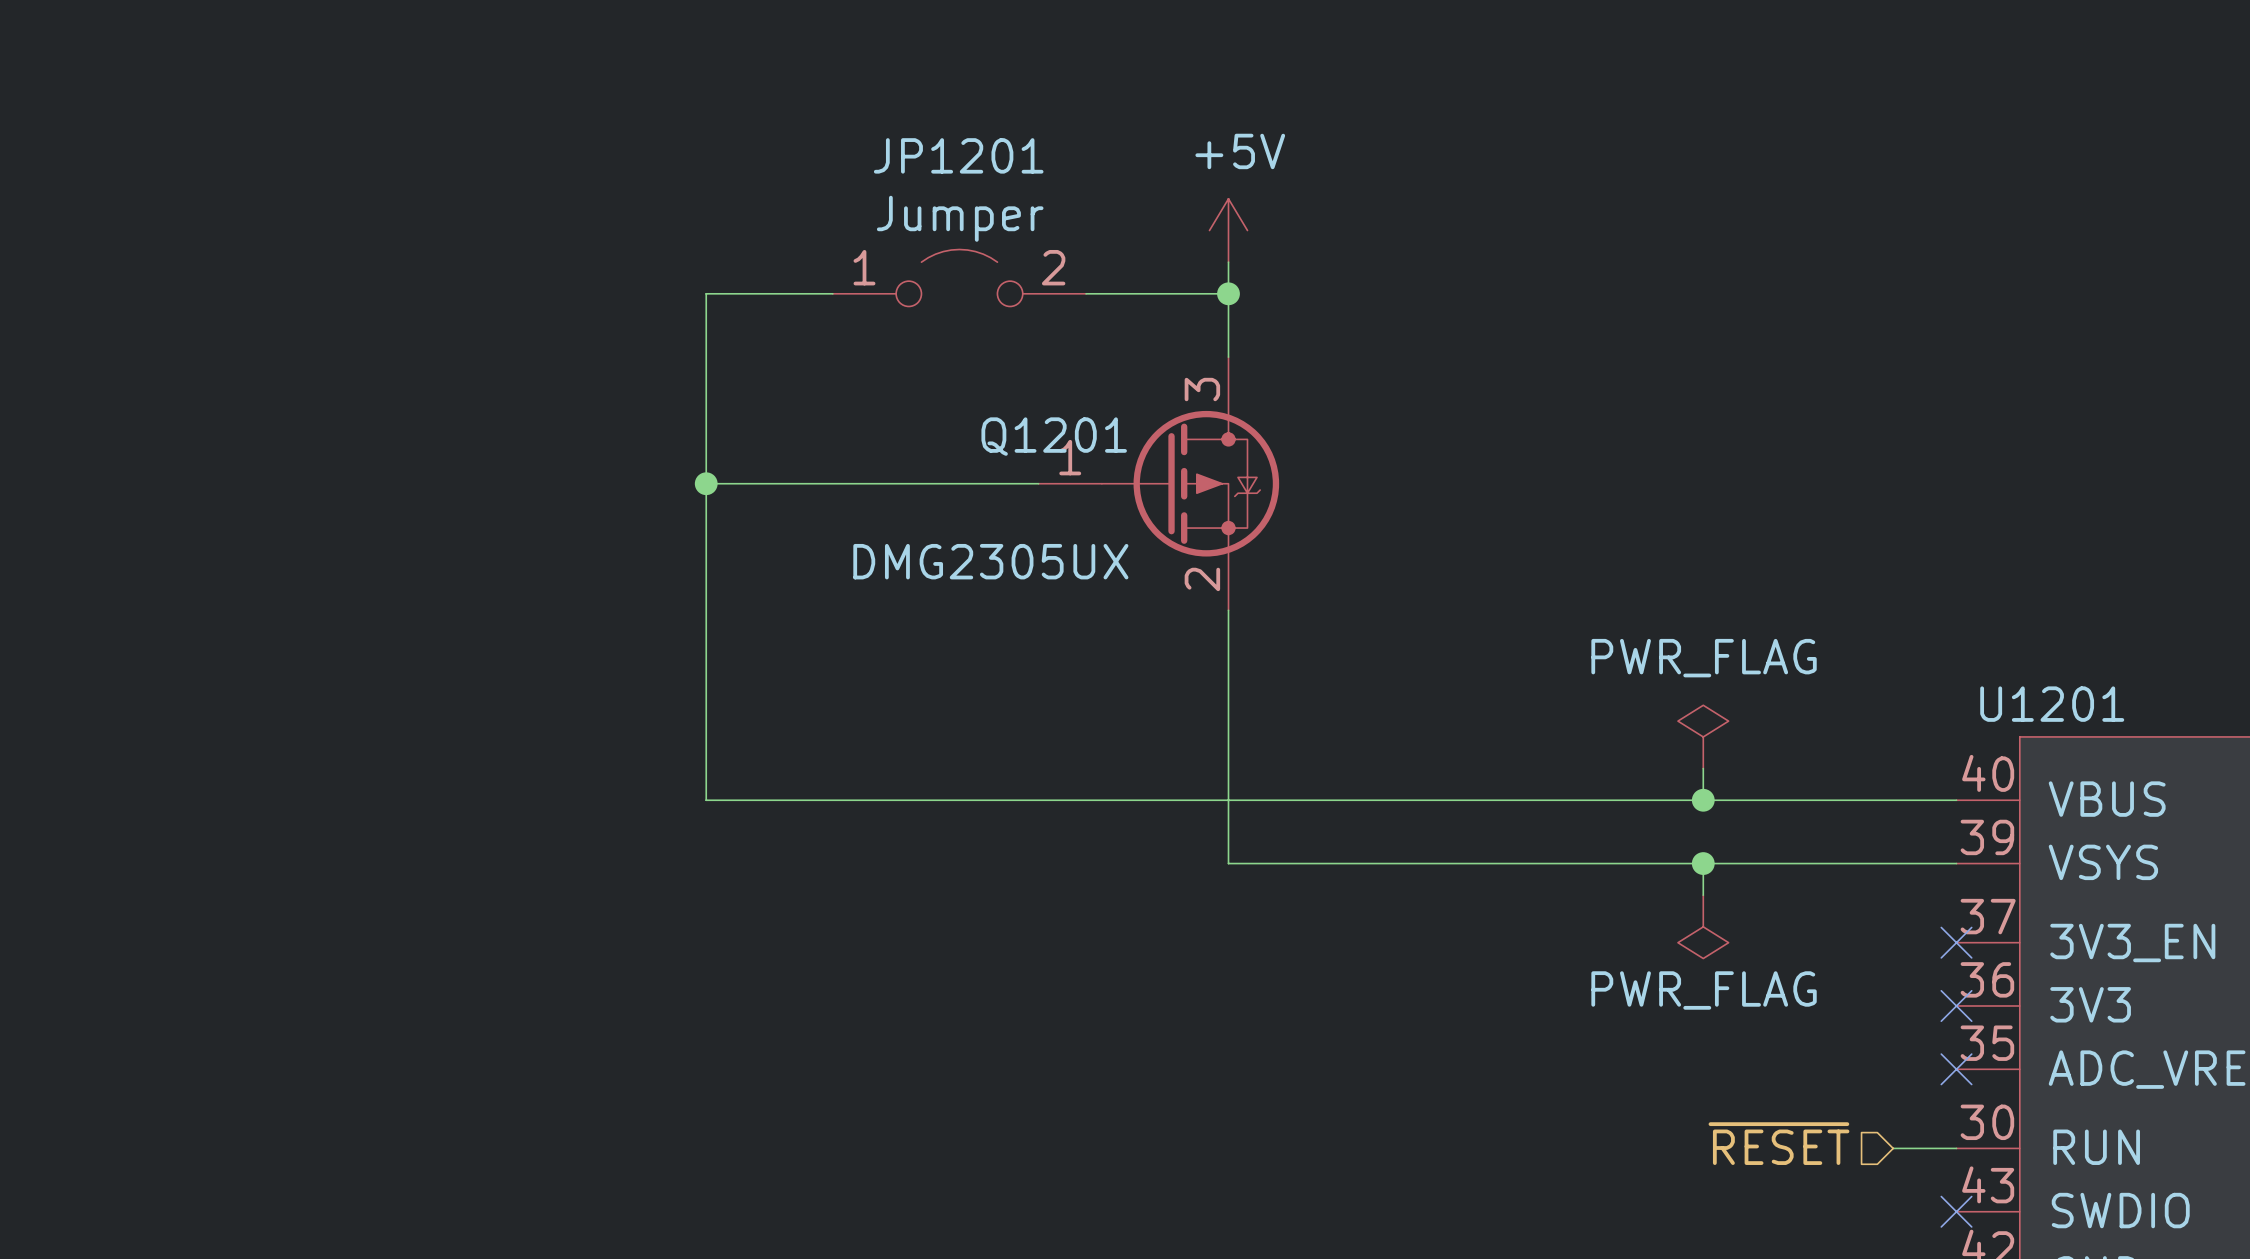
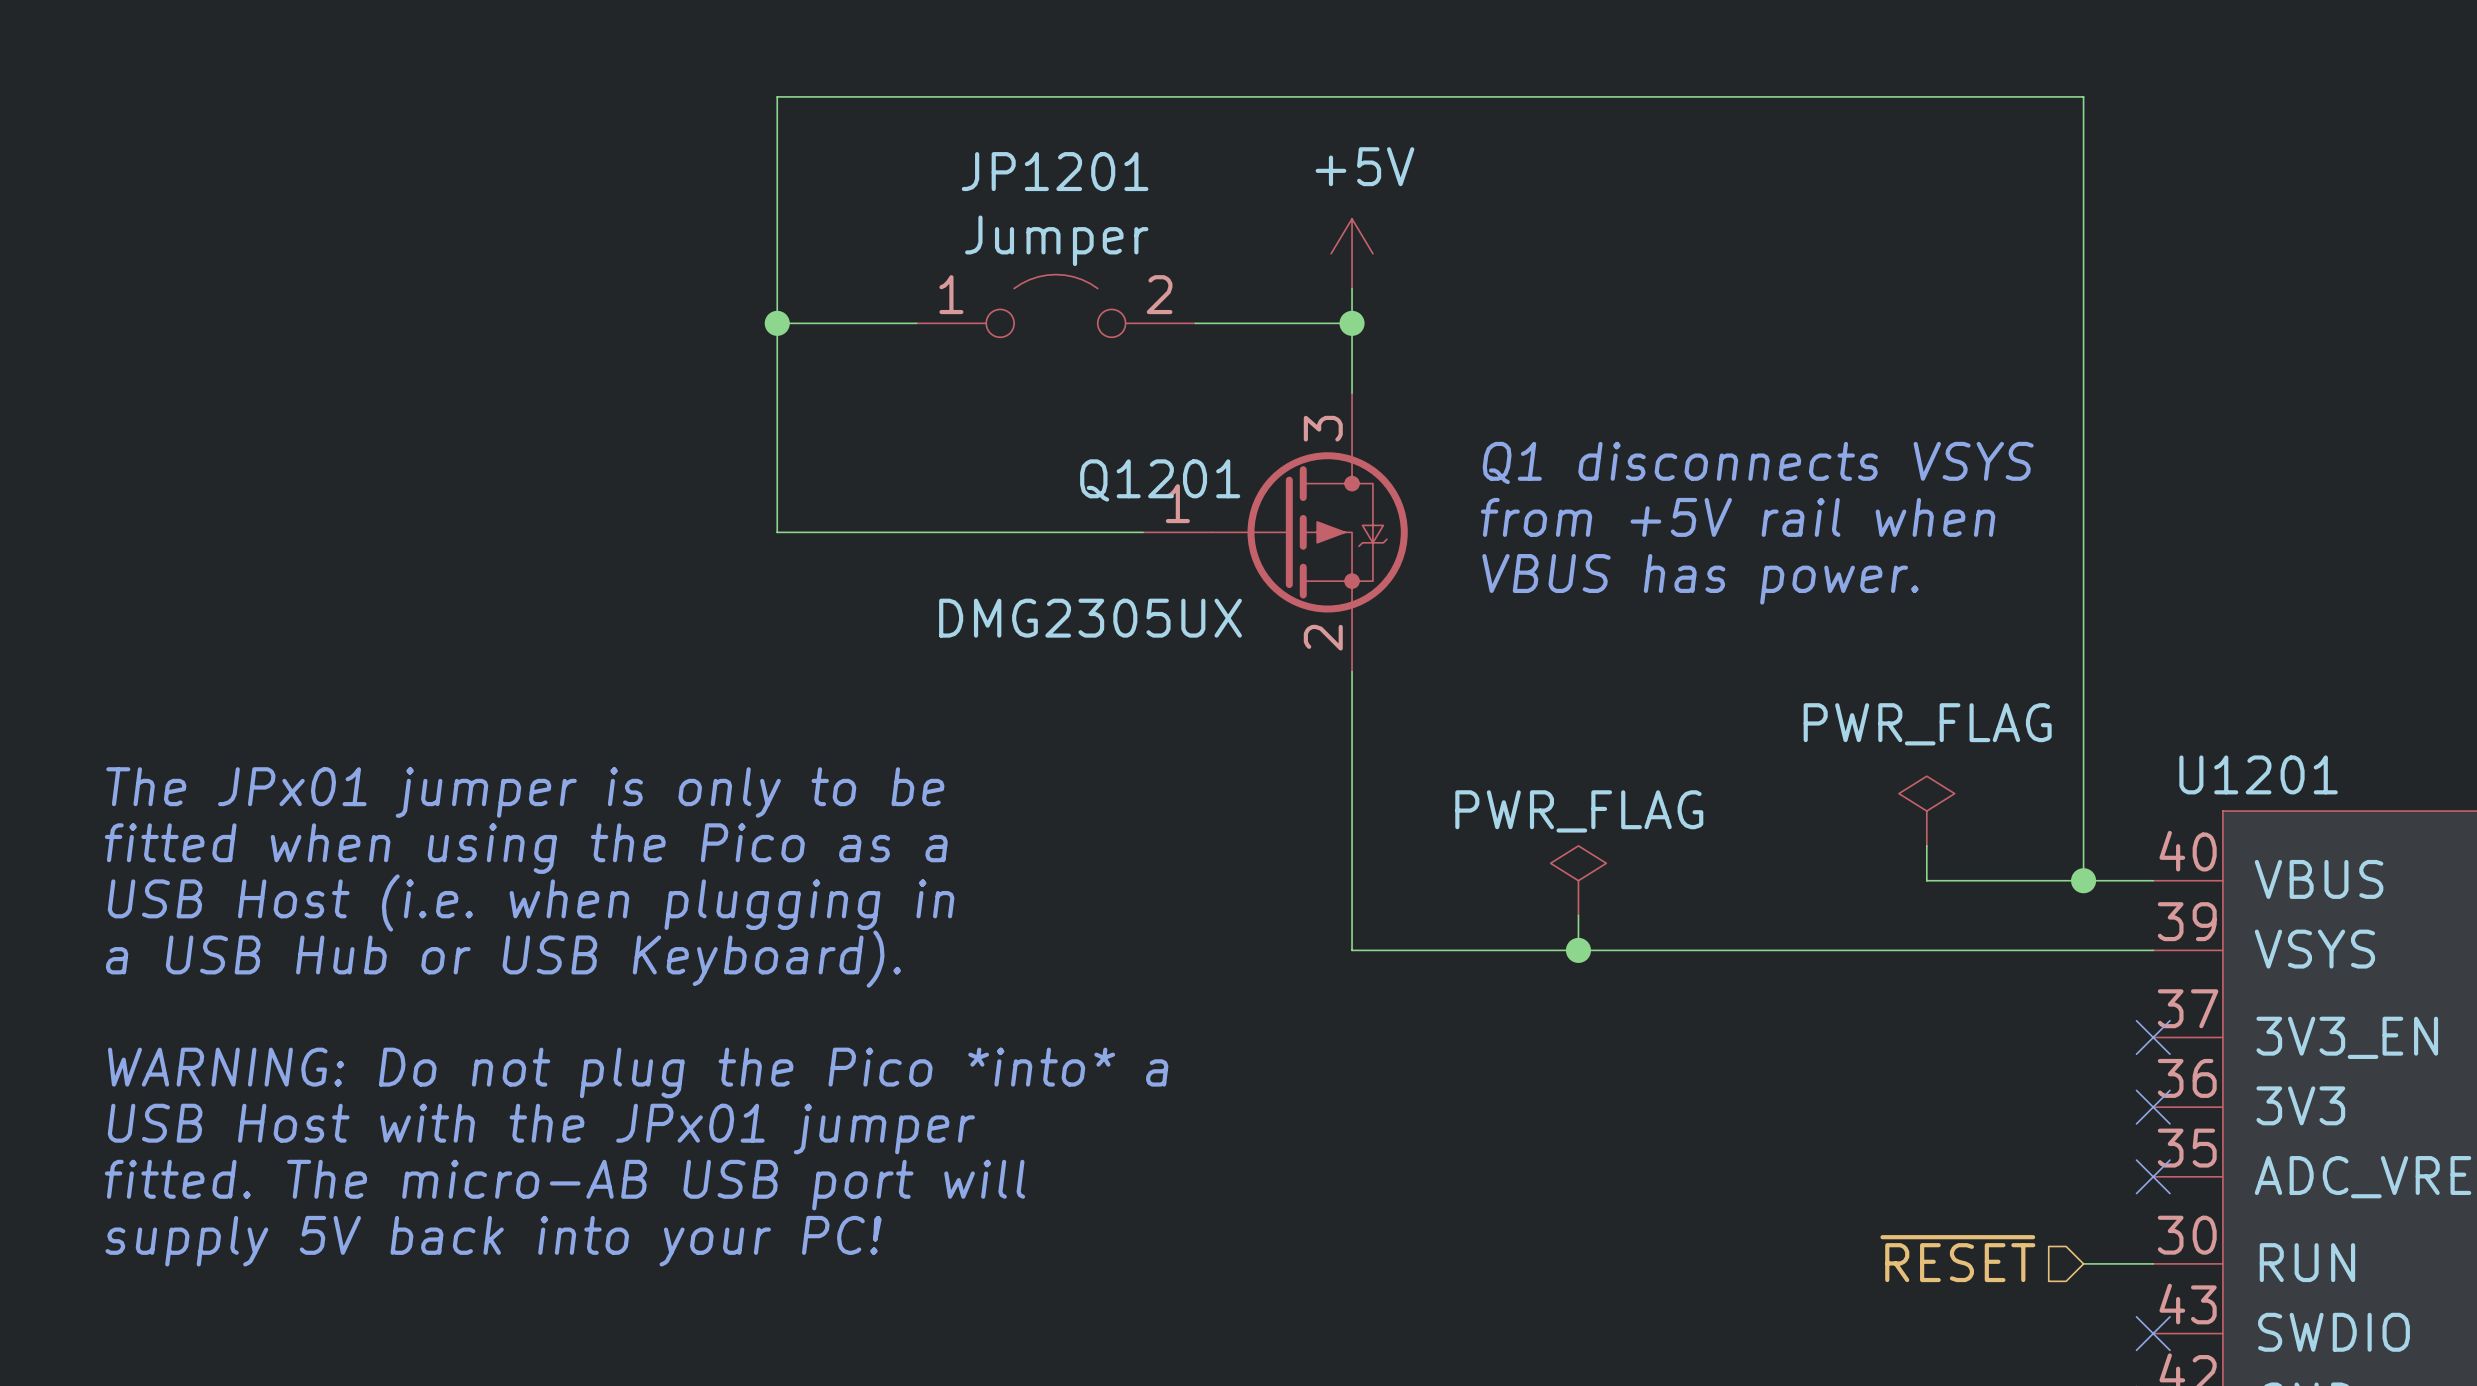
wire: none -> (777, 323) (777, 96) (2083, 96) (2083, 880)
junction: none -> (777, 323)
text: none -> Q1 disconnects VSYS (1758, 462)
text: none -> from +5V rail when (1738, 517)
wire: (706, 483) (706, 800) (1750, 800) -> (1926, 845) (1926, 880)
junction: (706, 483) -> none
text: none -> VBUS has power. (1700, 579)
text: none -> The JPx01 jumper is only to be (525, 792)
power symbol position: PWR_FLAG (1703, 736) -> PWR_FLAG (1926, 811)
wire: (1703, 768) (1703, 800) -> none
text: none -> fitted when using the Pico as a (526, 848)
power symbol: none -> PWR_FLAG (1578, 880)
junction: (1703, 800) -> none
junction: none -> (2083, 880)
text: none -> USB Host (i.e. when plugging in (531, 903)
junction: none -> (1578, 950)
wire: (1703, 863) (1703, 895) -> (1578, 915) (1578, 950)
junction: (1703, 863) -> none
text: none -> a USB Hub or USB Keyboard). (503, 959)
power symbol: PWR_FLAG (1703, 926) -> none
text: none -> WARNING: Do not plug the Pico *into* a (638, 1072)
text: none -> USB Host with the JPx01 jumper (541, 1129)
text: none -> fitted. The micro-AB USB port will (564, 1185)
text: none -> supply 5V back into your PC! (493, 1241)

